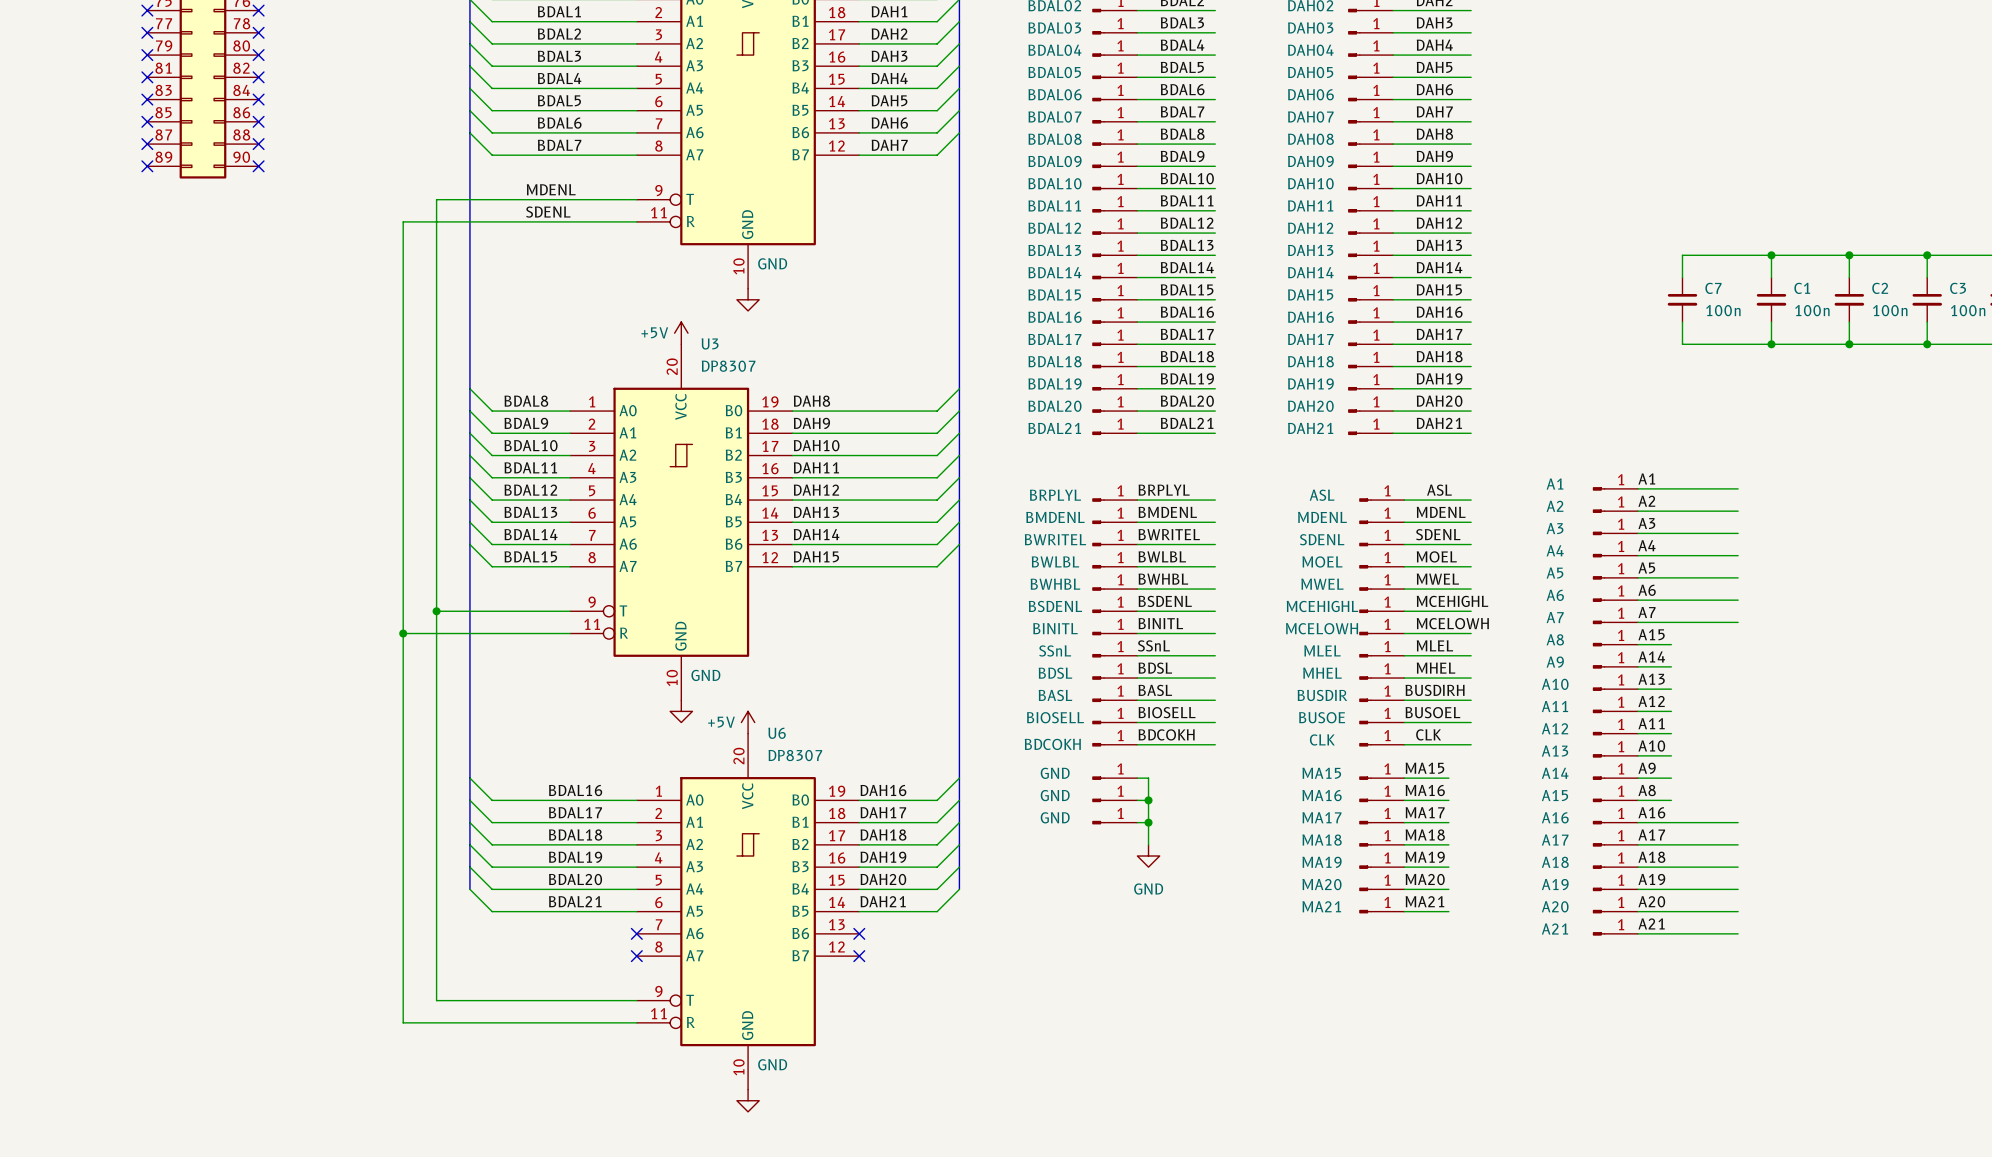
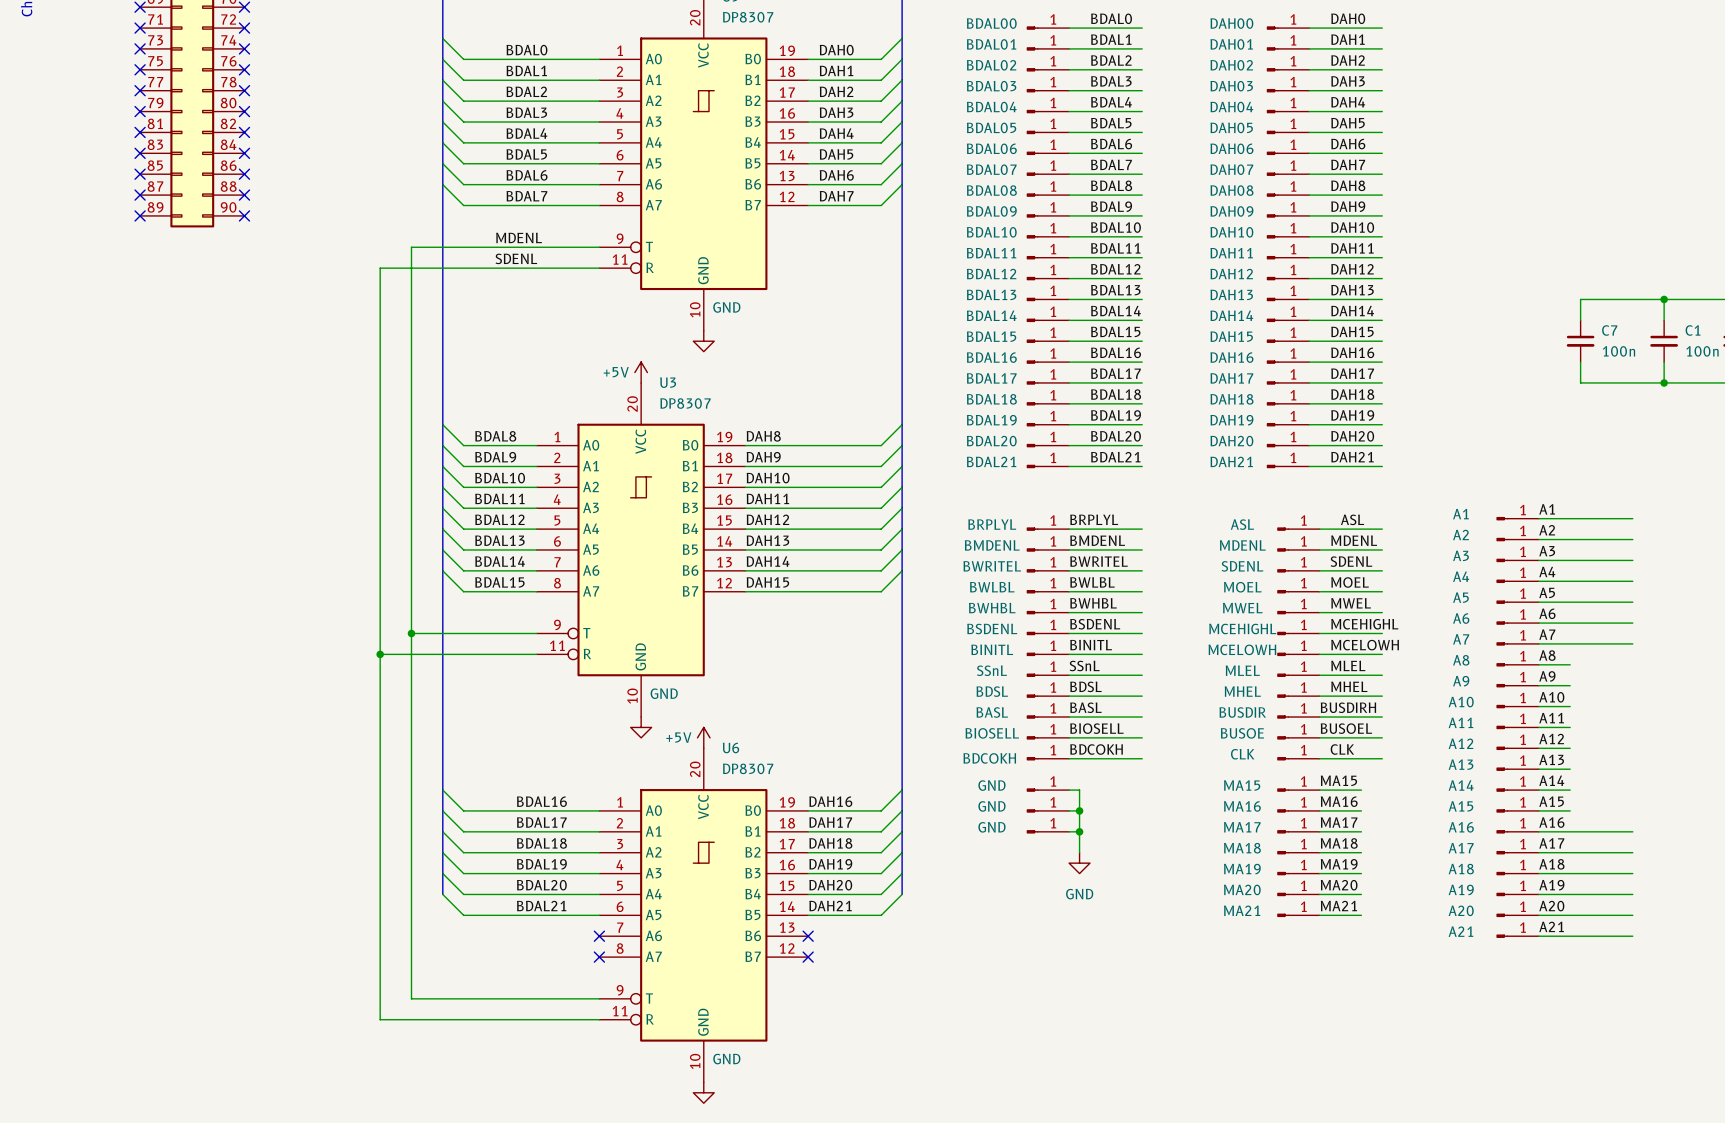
label: A15 (1651, 634) -> A8 (1547, 655)
label: A14 (1651, 656) -> A9 (1547, 676)
label: A13 (1651, 679) -> A10 (1551, 697)
label: A12 (1651, 701) -> A11 (1551, 718)
label: A11 (1651, 723) -> A12 (1551, 739)
label: A10 (1651, 746) -> A13 (1551, 759)
label: A9 (1647, 768) -> A14 (1551, 780)
label: A8 (1647, 790) -> A15 (1551, 801)

